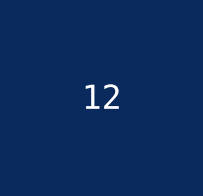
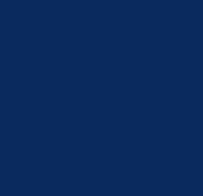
drawing: [85, 84, 119, 109] -> none

